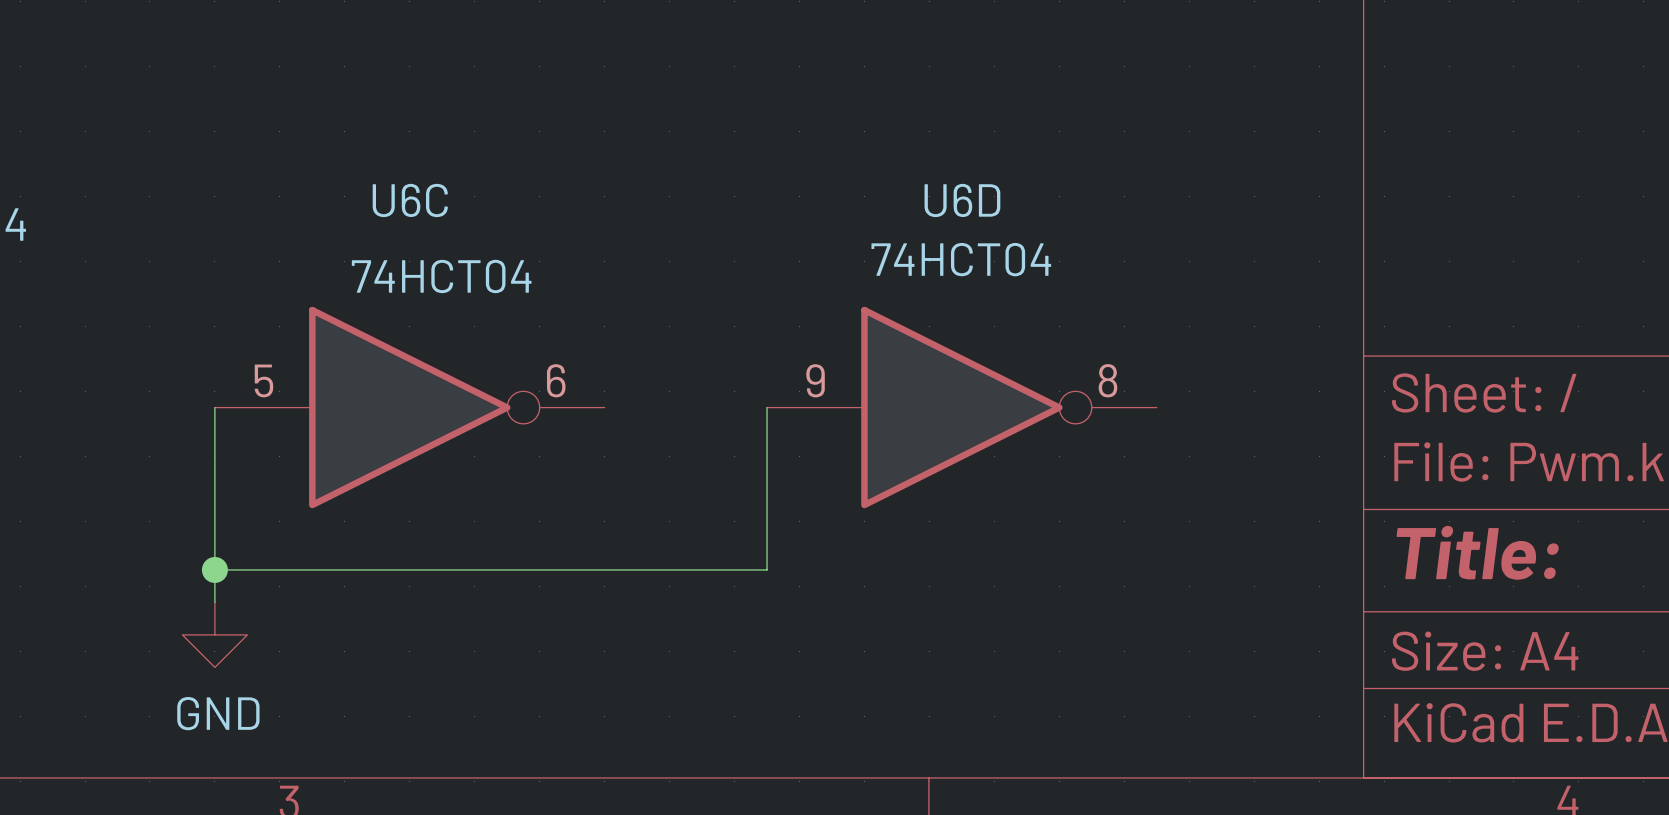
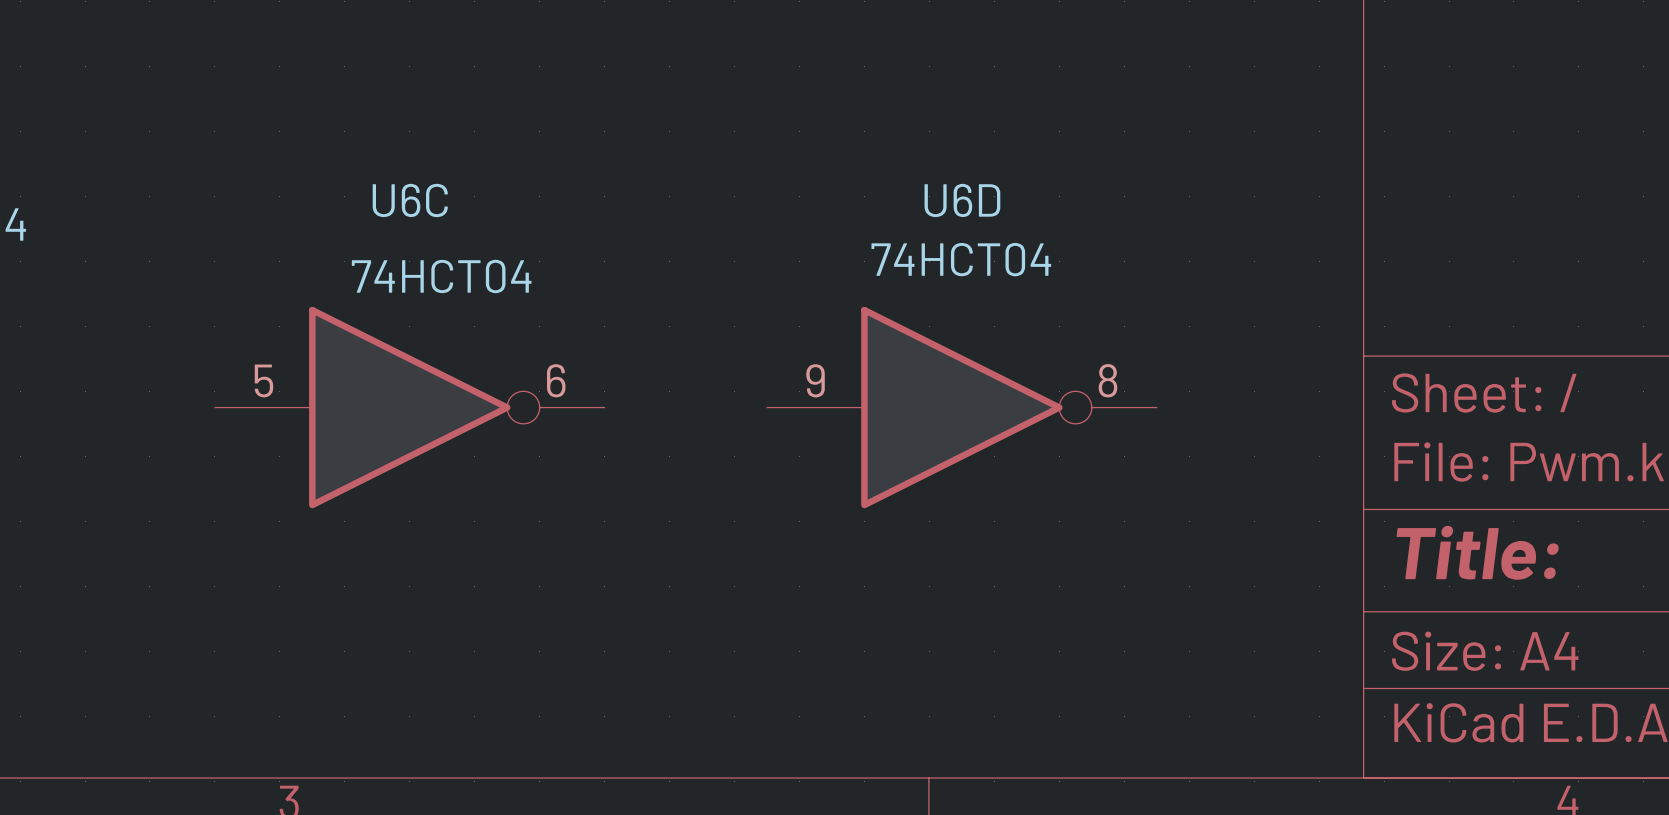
wire: (214, 407) (214, 602) -> none
wire: (767, 407) (767, 569) (214, 569) -> none
junction: (214, 569) -> none
power symbol: GND (214, 634) -> none

